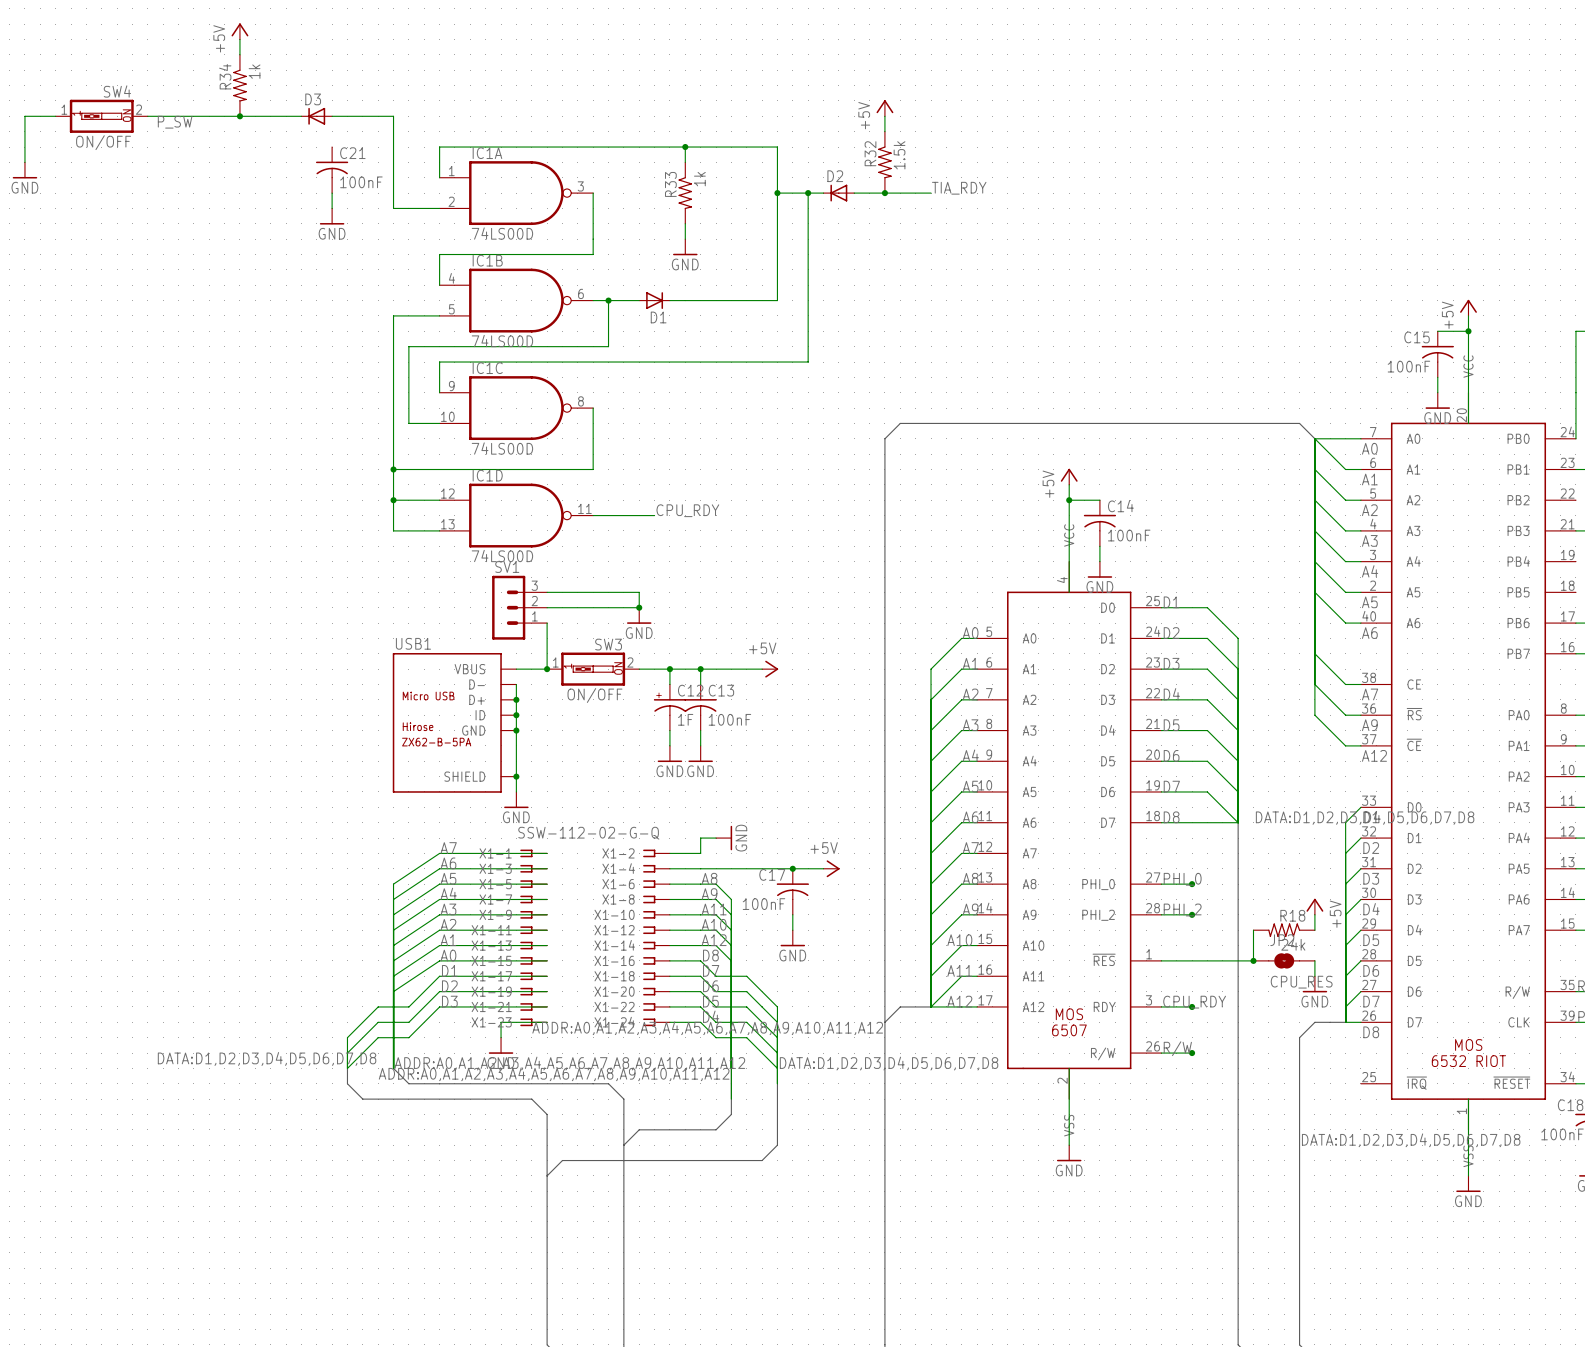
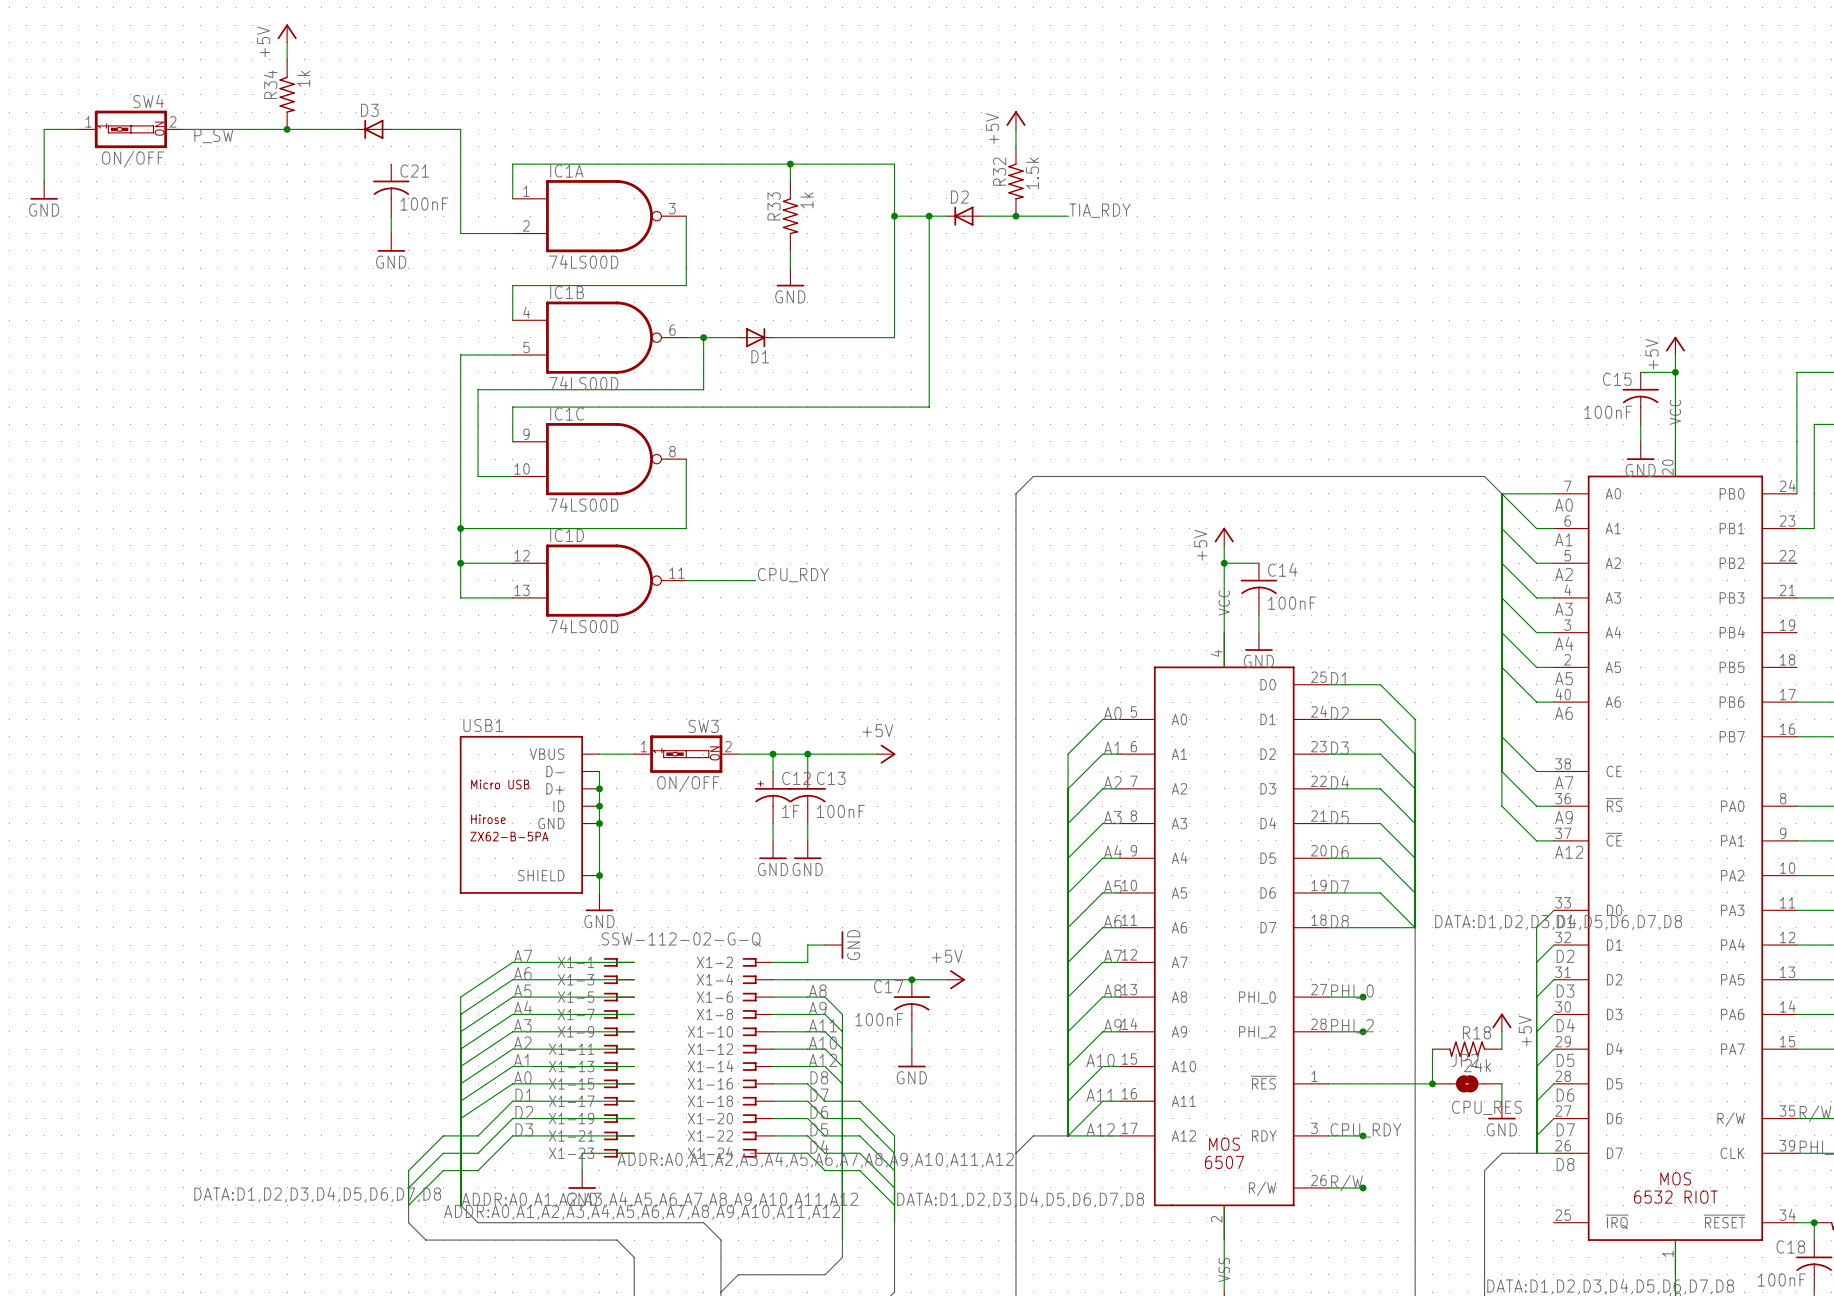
wire: (547, 592) (639, 592) (639, 607) (547, 607) -> none
SV1: (519, 607) -> none
junction: (639, 607) -> none
power symbol: GND (639, 615) -> none
wire: (547, 623) (547, 669) -> none
junction: (547, 669) -> none

